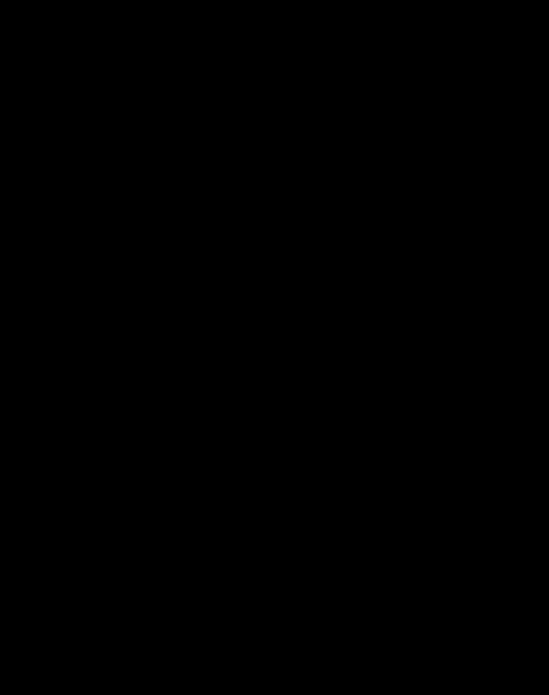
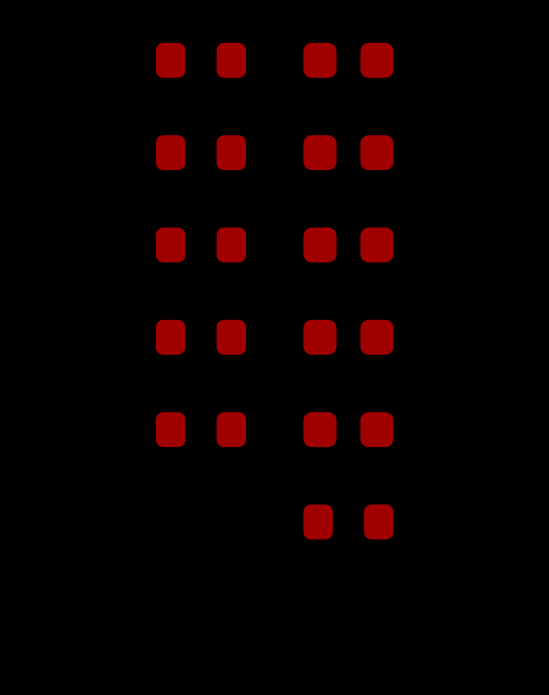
part: none -> (200, 60)
part: none -> (348, 60)
part: none -> (200, 152)
part: none -> (348, 152)
part: none -> (200, 244)
part: none -> (348, 244)
part: none -> (200, 337)
part: none -> (348, 337)
part: none -> (200, 429)
part: none -> (348, 429)
part: none -> (348, 521)

